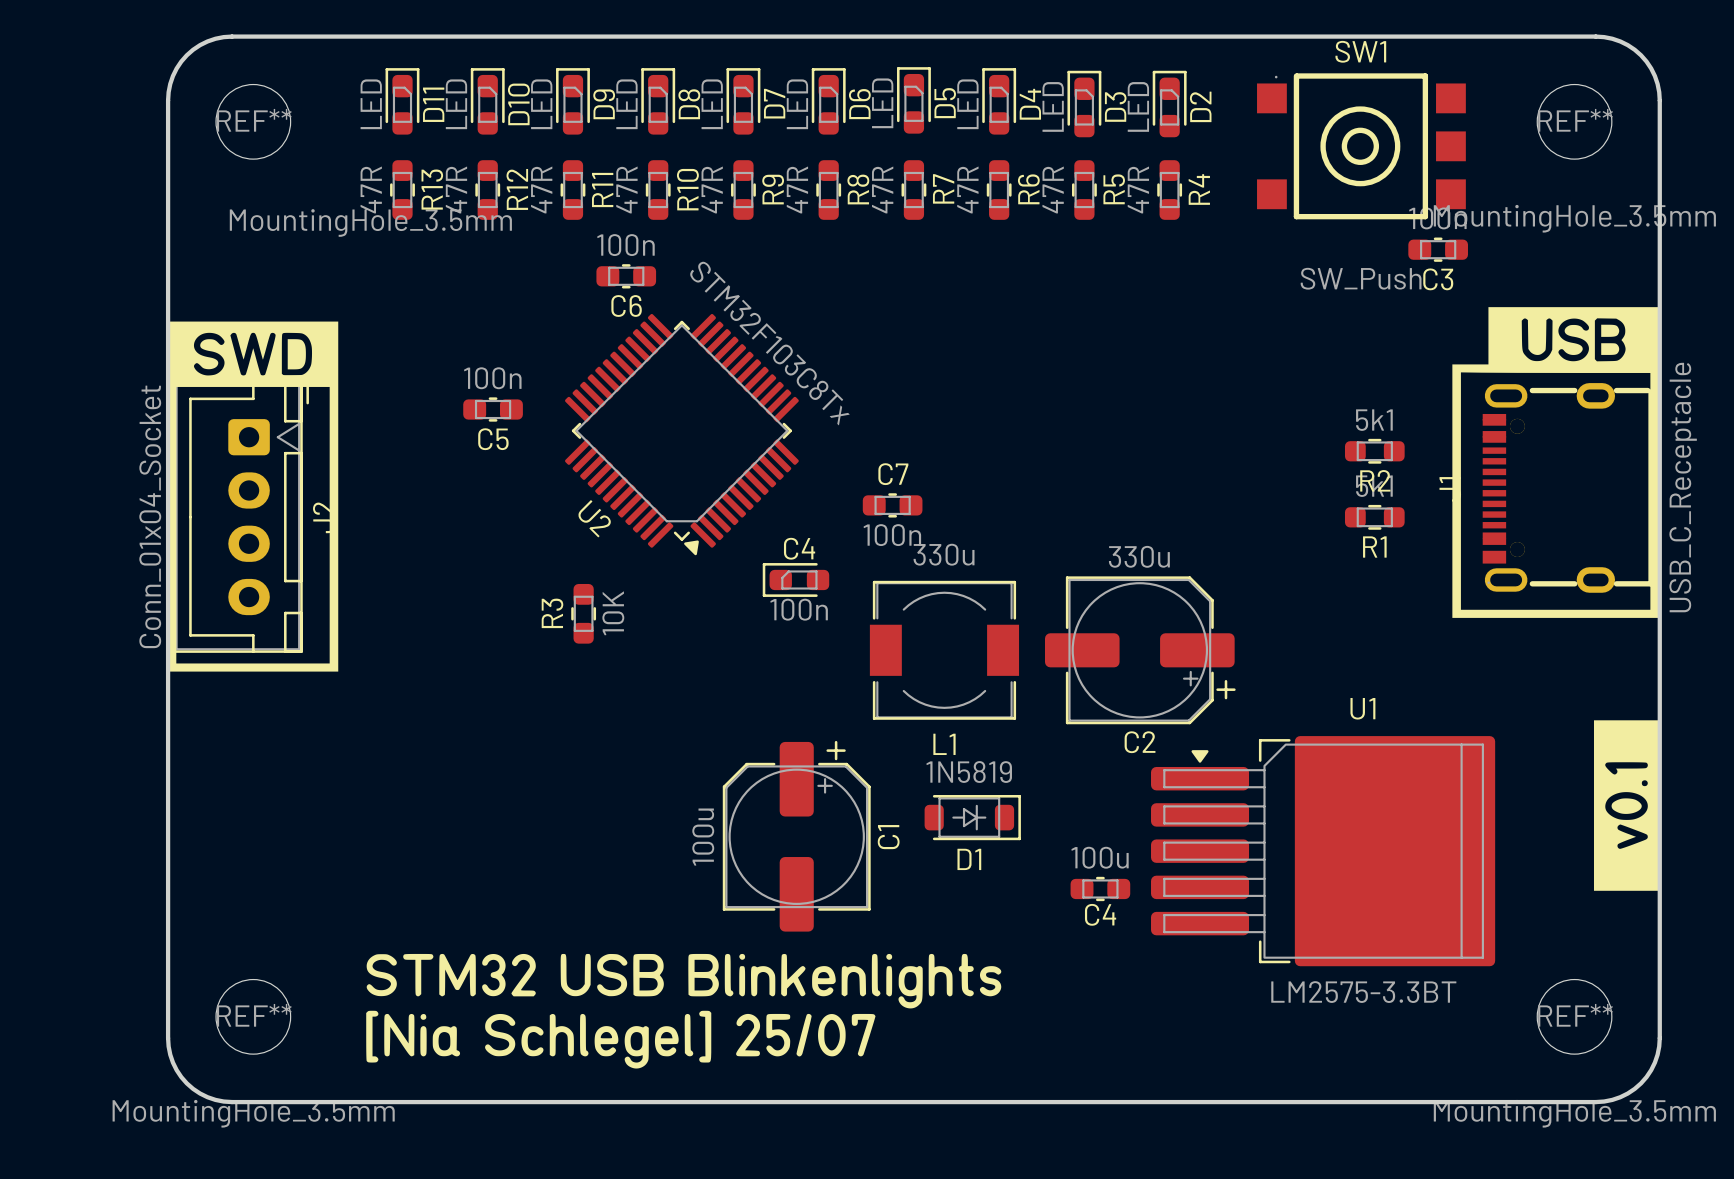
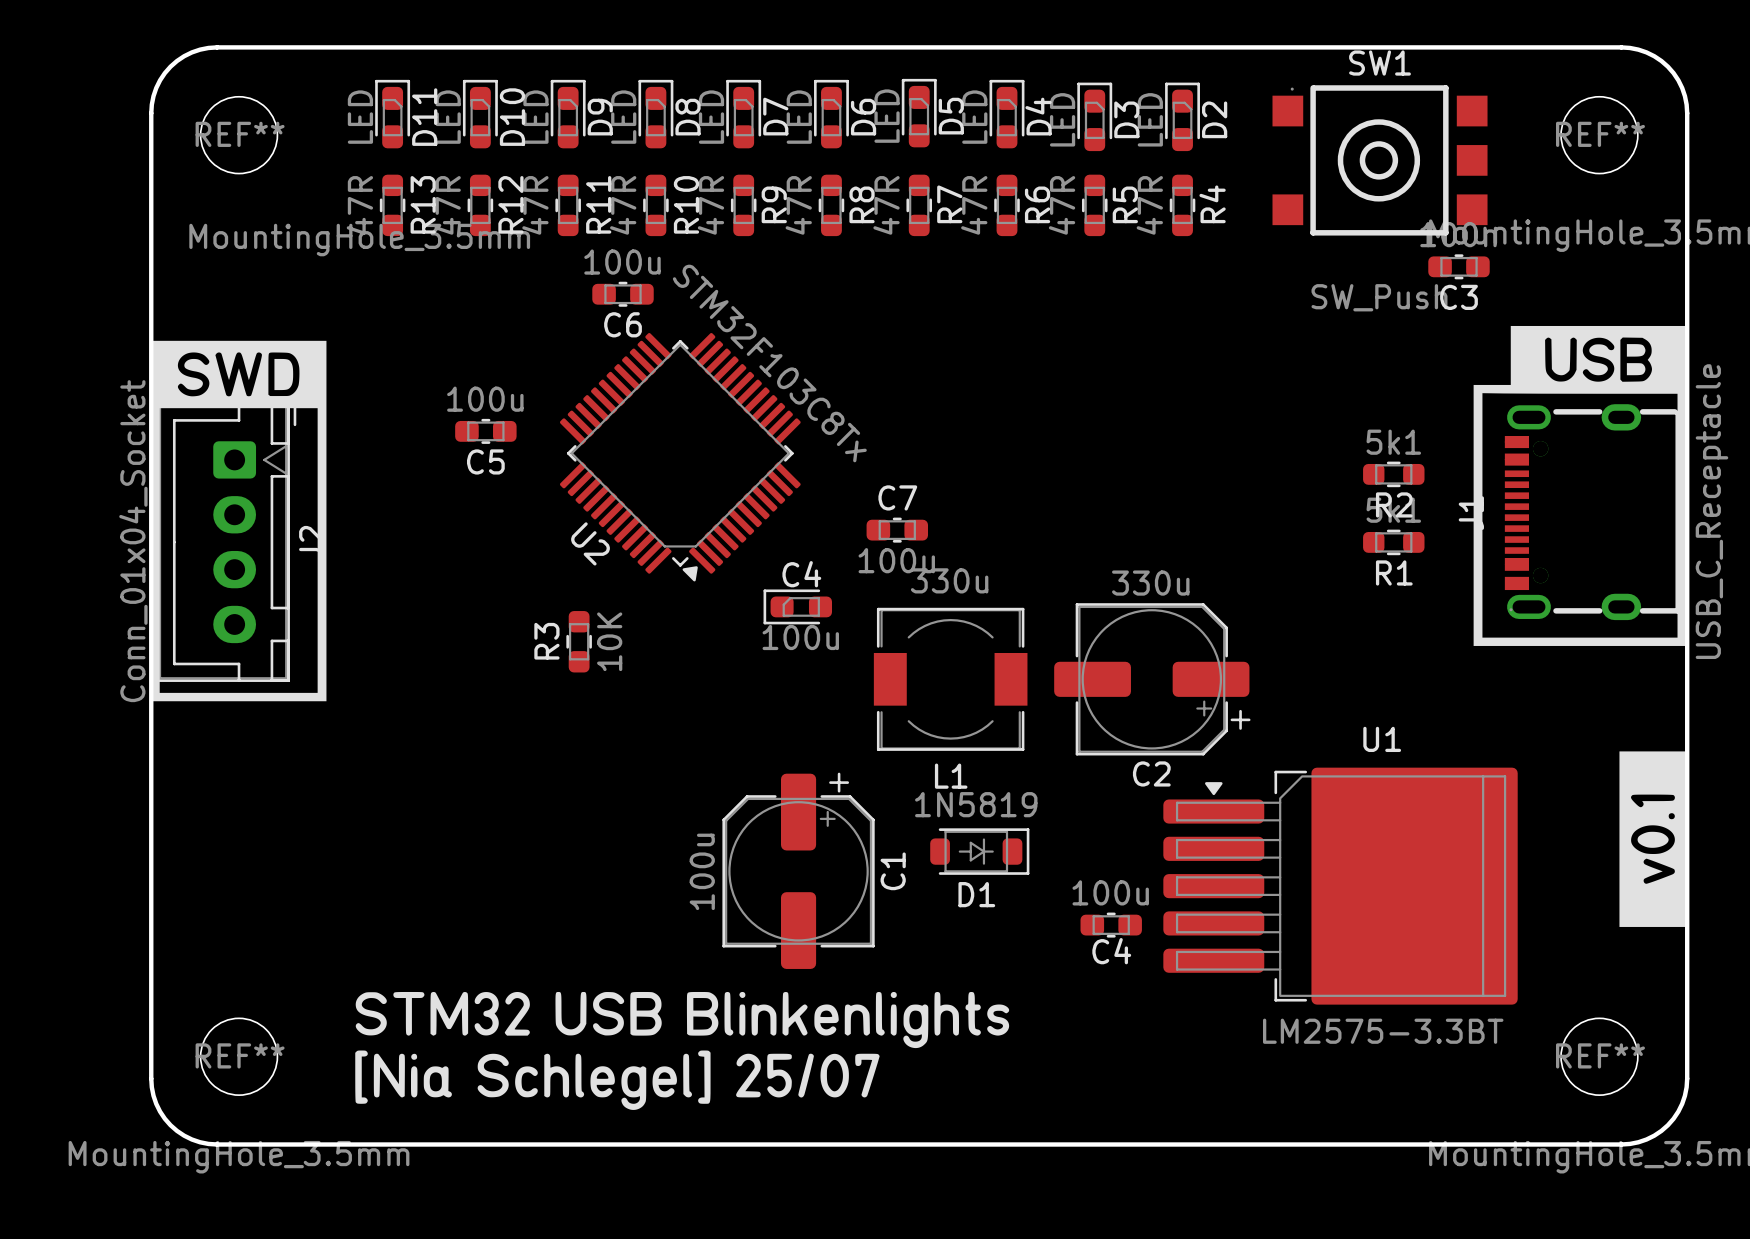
C6 value: 100n (626, 245) -> 100u (622, 262)
C5 value: 100n (492, 378) -> 100u (485, 399)
C7 value: 100n (892, 535) -> 100u (896, 560)
C4 value: 100n (799, 609) -> 100u (800, 637)

